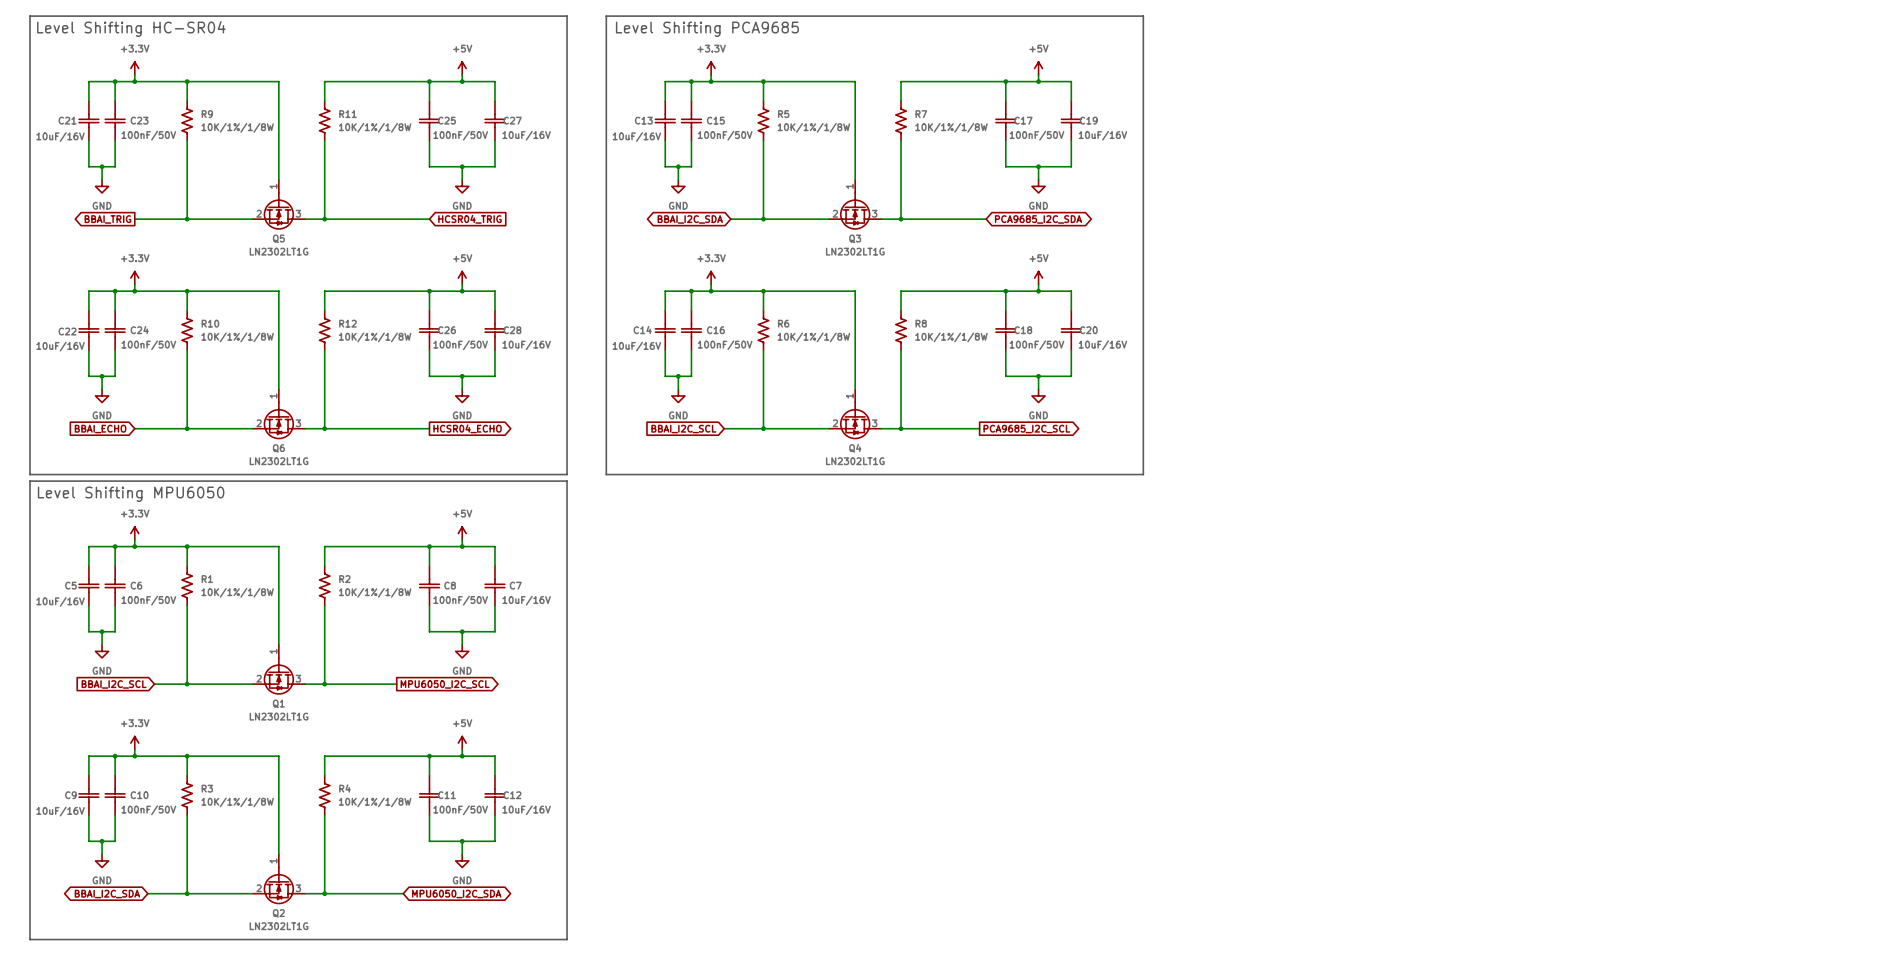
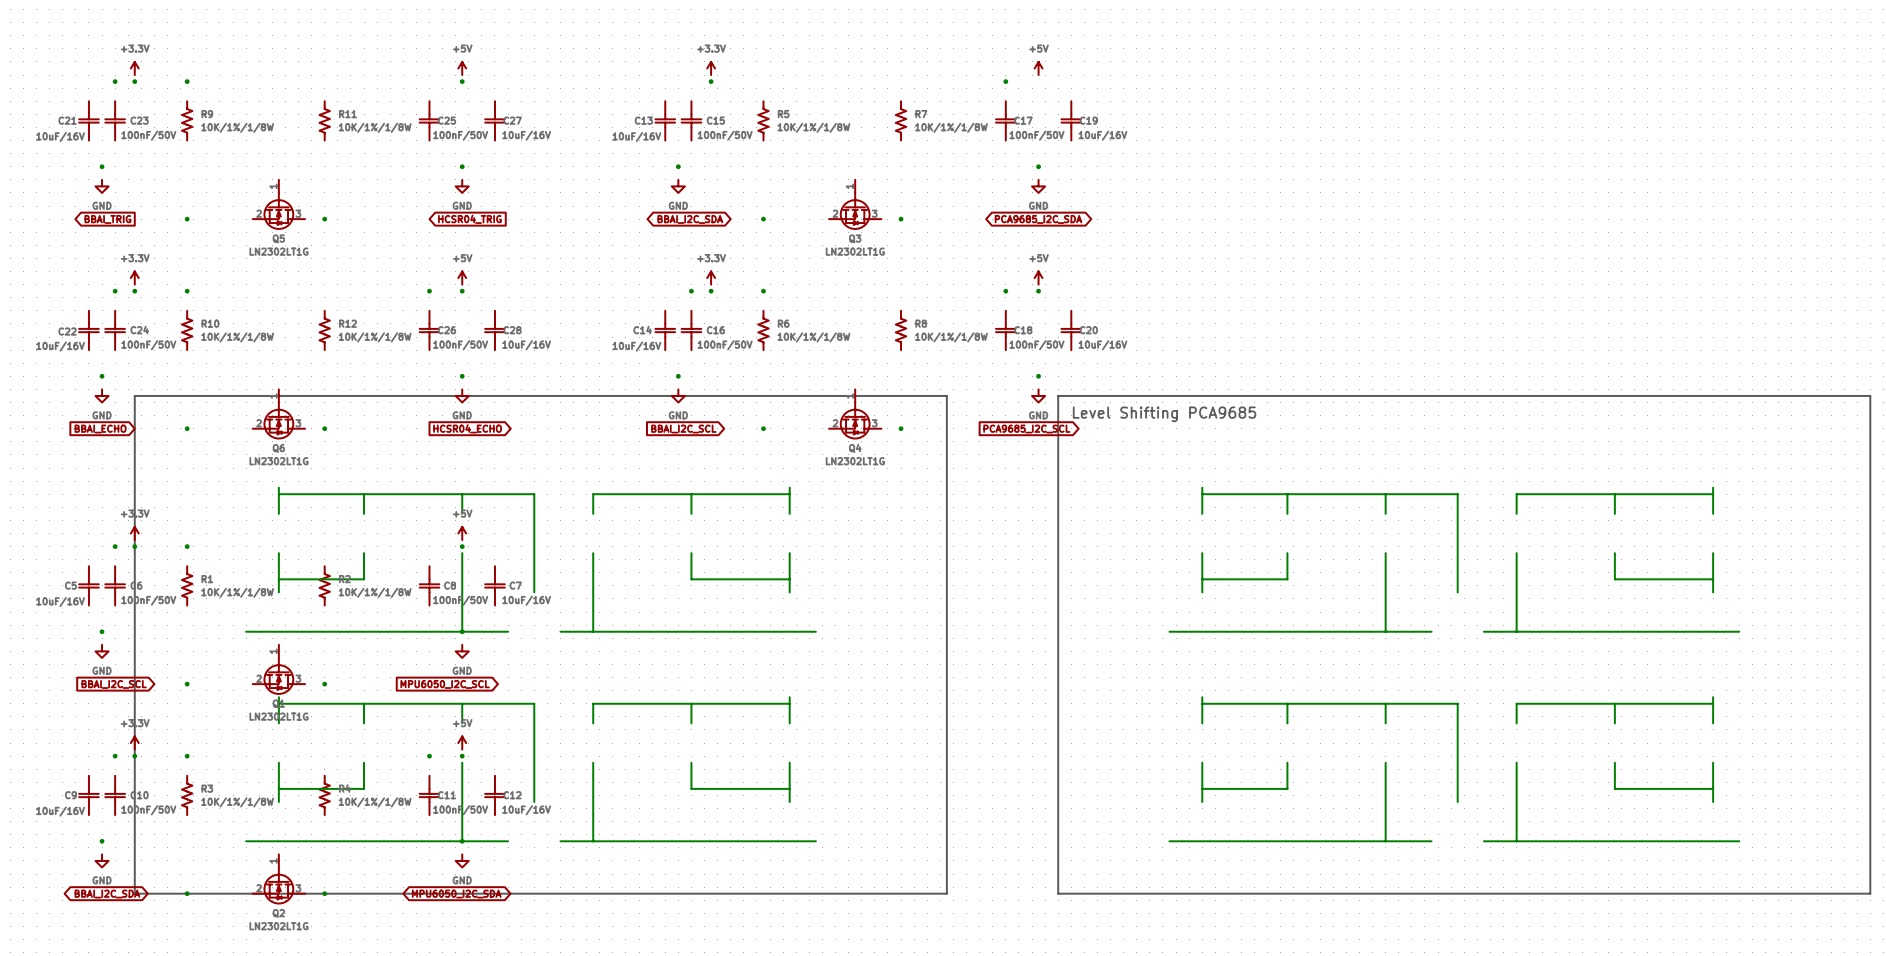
line: (29, 16) (29, 474) (567, 474) (567, 16) (29, 16) -> none
line: (606, 16) (1143, 16) (1143, 474) (606, 474) (606, 16) -> none
text: Level Shifting HC-SR04 (131, 29) -> none
text: Level Shifting PCA9685 (707, 29) -> none
wire: (134, 75) (134, 81) -> none
wire: (462, 75) (462, 81) -> none
wire: (711, 75) (711, 81) -> none
wire: (1038, 75) (1038, 81) -> none
wire: (115, 81) (115, 101) -> none
wire: (187, 81) (187, 101) -> none
wire: (429, 81) (429, 101) -> none
junction: (429, 81) -> none
wire: (691, 81) (691, 101) -> none
junction: (691, 81) -> none
wire: (763, 81) (763, 101) -> none
junction: (763, 81) -> none
wire: (1005, 81) (1005, 101) -> none
junction: (1038, 81) -> none
wire: (88, 101) (88, 81) (278, 81) (278, 179) -> none
wire: (324, 101) (324, 81) (494, 81) (494, 101) -> none
wire: (665, 101) (665, 81) (855, 81) (855, 179) -> none
wire: (901, 101) (901, 81) (1071, 81) (1071, 101) -> none
wire: (88, 140) (88, 166) (115, 166) (115, 140) -> none
wire: (187, 140) (187, 219) -> none
wire: (324, 140) (324, 219) -> none
wire: (429, 140) (429, 166) (494, 166) (494, 140) -> none
wire: (665, 140) (665, 166) (691, 166) (691, 140) -> none
wire: (763, 140) (763, 219) -> none
wire: (901, 140) (901, 219) -> none
wire: (1005, 140) (1005, 166) (1071, 166) (1071, 140) -> none
wire: (102, 166) (102, 179) -> none
wire: (462, 166) (462, 179) -> none
wire: (678, 166) (678, 179) -> none
wire: (1038, 166) (1038, 179) -> none
wire: (134, 219) (252, 219) -> none
wire: (305, 219) (429, 219) -> none
wire: (730, 219) (828, 219) -> none
wire: (881, 219) (986, 219) -> none
wire: (134, 284) (134, 291) -> none
wire: (462, 284) (462, 291) -> none
wire: (711, 284) (711, 291) -> none
wire: (1038, 284) (1038, 291) -> none
wire: (115, 291) (115, 310) -> none
wire: (187, 291) (187, 310) -> none
wire: (429, 291) (429, 310) -> none
wire: (691, 291) (691, 310) -> none
wire: (763, 291) (763, 310) -> none
wire: (1005, 291) (1005, 310) -> none
wire: (88, 310) (88, 291) (278, 291) (278, 389) -> none
wire: (324, 310) (324, 291) (494, 291) (494, 310) -> none
wire: (665, 310) (665, 291) (855, 291) (855, 389) -> none
wire: (901, 310) (901, 291) (1071, 291) (1071, 310) -> none
wire: (88, 350) (88, 376) (115, 376) (115, 350) -> none
wire: (187, 350) (187, 428) -> none
wire: (324, 350) (324, 428) -> none
wire: (429, 350) (429, 376) (494, 376) (494, 350) -> none
wire: (665, 350) (665, 376) (691, 376) (691, 350) -> none
wire: (763, 350) (763, 428) -> none
wire: (901, 350) (901, 428) -> none
wire: (1005, 350) (1005, 376) (1071, 376) (1071, 350) -> none
wire: (102, 376) (102, 389) -> none
wire: (462, 376) (462, 389) -> none
wire: (678, 376) (678, 389) -> none
wire: (1038, 376) (1038, 389) -> none
line: none -> (134, 395) (946, 395) (946, 893) (134, 893) (134, 395)
line: none -> (1058, 395) (1870, 395) (1870, 893) (1058, 893) (1058, 395)
text: none -> Level Shifting PCA9685 (1164, 414)
wire: (134, 428) (252, 428) -> none
wire: (305, 428) (429, 428) -> none
wire: (724, 428) (828, 428) -> none
wire: (881, 428) (979, 428) -> none
line: (29, 481) (567, 481) (567, 939) (29, 939) (29, 481) -> none
wire: none -> (278, 487) (278, 513)
wire: none -> (789, 487) (789, 513)
wire: none -> (1202, 487) (1202, 513)
wire: none -> (1713, 487) (1713, 513)
text: Level Shifting MPU6050 (131, 494) -> none
wire: none -> (278, 494) (534, 494) (534, 592)
wire: none -> (364, 494) (364, 513)
wire: none -> (691, 494) (691, 513)
wire: none -> (789, 494) (593, 494) (593, 513)
wire: none -> (1202, 494) (1457, 494) (1457, 592)
wire: none -> (1287, 494) (1287, 513)
wire: none -> (1385, 494) (1385, 513)
wire: none -> (1614, 494) (1614, 513)
wire: none -> (1713, 494) (1516, 494) (1516, 513)
wire: (462, 540) (462, 546) -> none
wire: (115, 546) (115, 566) -> none
wire: (187, 546) (187, 566) -> none
wire: (429, 546) (429, 566) -> (462, 494) (462, 513)
junction: (429, 546) -> none
wire: (278, 553) (278, 546) (88, 546) (88, 566) -> none
wire: none -> (364, 553) (364, 579) (278, 579)
wire: none -> (593, 553) (593, 631)
wire: none -> (691, 553) (691, 579) (789, 579)
wire: none -> (789, 553) (789, 592)
wire: none -> (1202, 553) (1202, 592)
wire: none -> (1287, 553) (1287, 579) (1202, 579)
wire: none -> (1385, 553) (1385, 631)
wire: none -> (1516, 553) (1516, 631)
wire: none -> (1614, 553) (1614, 579) (1713, 579)
wire: none -> (1713, 553) (1713, 592)
wire: (324, 566) (324, 546) (494, 546) (494, 566) -> none
wire: (278, 592) (278, 644) -> none
wire: (88, 605) (88, 631) (115, 631) (115, 605) -> none
wire: (187, 605) (187, 684) -> none
wire: (324, 605) (324, 684) -> none
wire: (429, 605) (429, 631) -> (246, 631) (429, 631)
wire: (494, 605) (494, 631) -> (508, 631) (494, 631)
wire: (102, 631) (102, 644) -> none
wire: (462, 631) (462, 644) -> (462, 631) (462, 553)
wire: none -> (560, 631) (815, 631)
wire: none -> (1169, 631) (1431, 631)
wire: none -> (1483, 631) (1739, 631)
wire: (154, 684) (252, 684) -> none
wire: (305, 684) (396, 684) -> none
wire: none -> (278, 697) (278, 723)
wire: none -> (789, 697) (789, 723)
wire: none -> (1202, 697) (1202, 723)
wire: none -> (1713, 697) (1713, 723)
wire: none -> (278, 703) (534, 703) (534, 802)
wire: none -> (364, 703) (364, 723)
wire: none -> (691, 703) (691, 723)
wire: none -> (789, 703) (593, 703) (593, 723)
wire: none -> (1202, 703) (1457, 703) (1457, 802)
wire: none -> (1287, 703) (1287, 723)
wire: none -> (1385, 703) (1385, 723)
wire: none -> (1614, 703) (1614, 723)
wire: none -> (1713, 703) (1516, 703) (1516, 723)
wire: (462, 749) (462, 756) -> none
wire: (115, 756) (115, 775) -> none
wire: (187, 756) (187, 775) -> none
wire: (429, 756) (429, 775) -> (462, 703) (462, 723)
wire: (278, 762) (278, 756) (88, 756) (88, 775) -> none
wire: none -> (364, 762) (364, 788) (278, 788)
wire: none -> (593, 762) (593, 841)
wire: none -> (691, 762) (691, 788) (789, 788)
wire: none -> (789, 762) (789, 802)
wire: none -> (1202, 762) (1202, 802)
wire: none -> (1287, 762) (1287, 788) (1202, 788)
wire: none -> (1385, 762) (1385, 841)
wire: none -> (1516, 762) (1516, 841)
wire: none -> (1614, 762) (1614, 788) (1713, 788)
wire: none -> (1713, 762) (1713, 802)
wire: (324, 775) (324, 756) (494, 756) (494, 775) -> none
wire: (278, 802) (278, 854) -> none
wire: (88, 815) (88, 841) (115, 841) (115, 815) -> none
wire: (187, 815) (187, 893) -> none
wire: (324, 815) (324, 893) -> none
wire: (429, 815) (429, 841) -> (246, 841) (429, 841)
wire: (494, 815) (494, 841) -> (508, 841) (494, 841)
wire: (102, 841) (102, 854) -> none
wire: (462, 841) (462, 854) -> (462, 841) (462, 762)
wire: none -> (560, 841) (815, 841)
wire: none -> (1169, 841) (1431, 841)
wire: none -> (1483, 841) (1739, 841)

